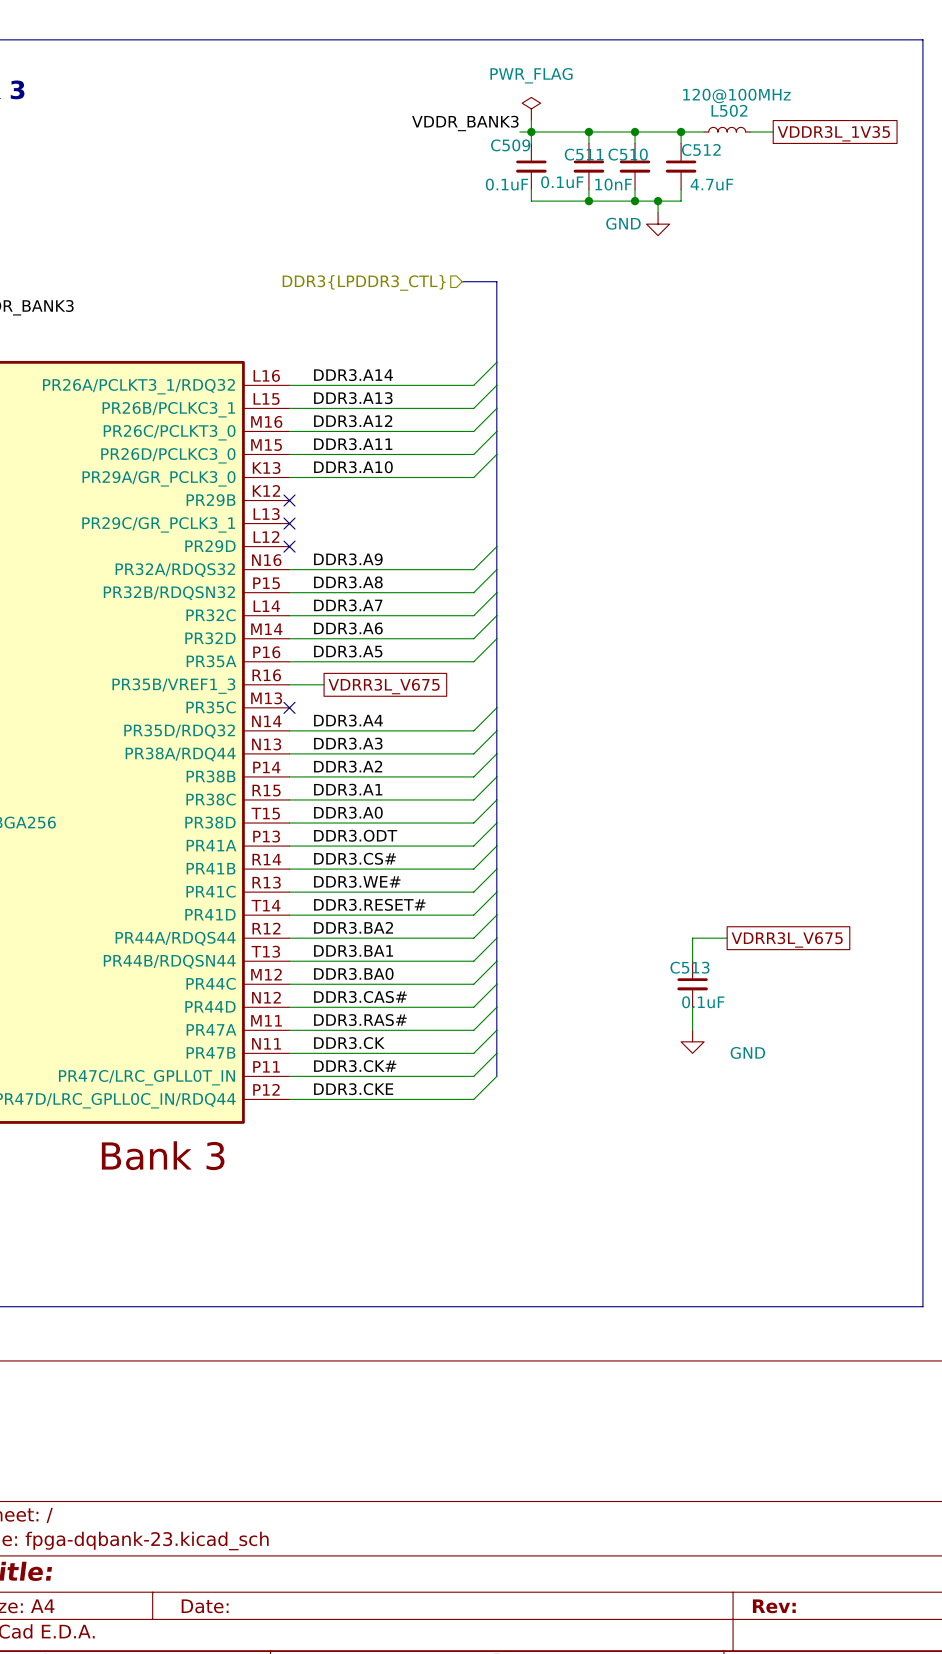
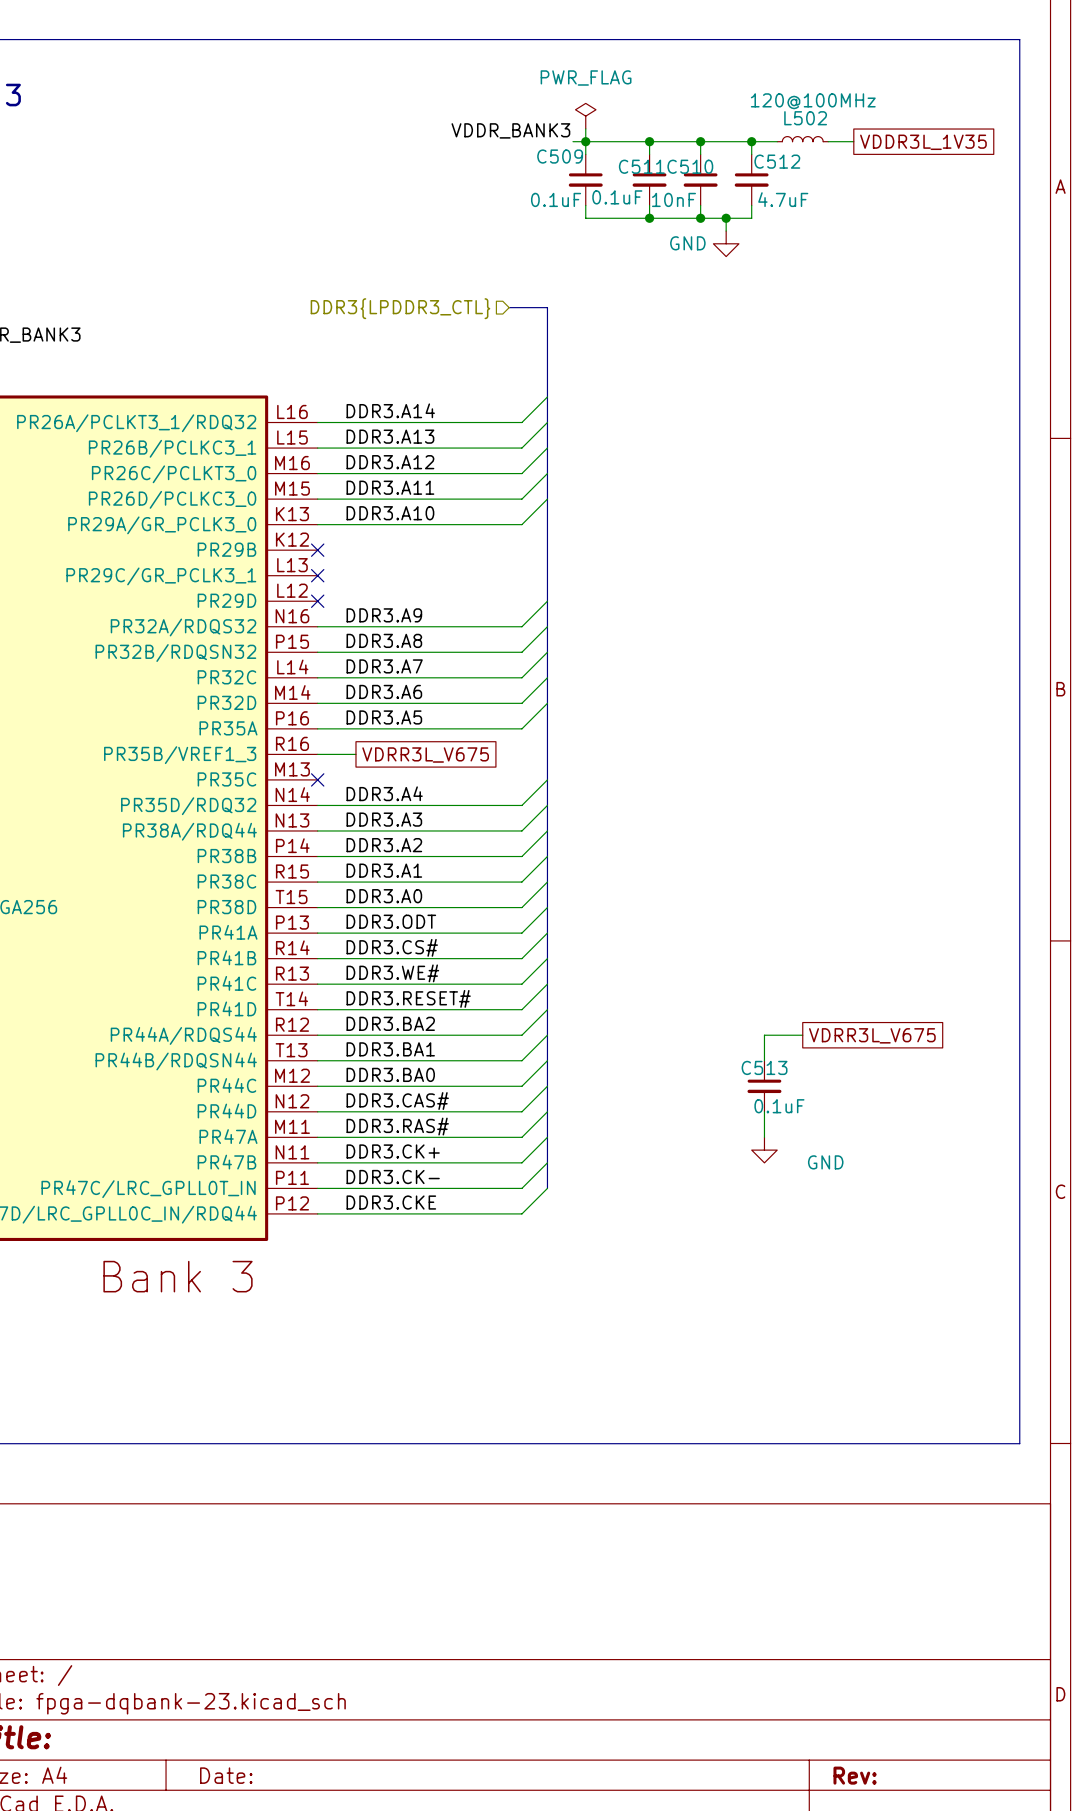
label: DDR3.CK (349, 1043) -> DDR3.CK+ (393, 1151)
label: DDR3.CK# (355, 1066) -> DDR3.CK- (393, 1177)

